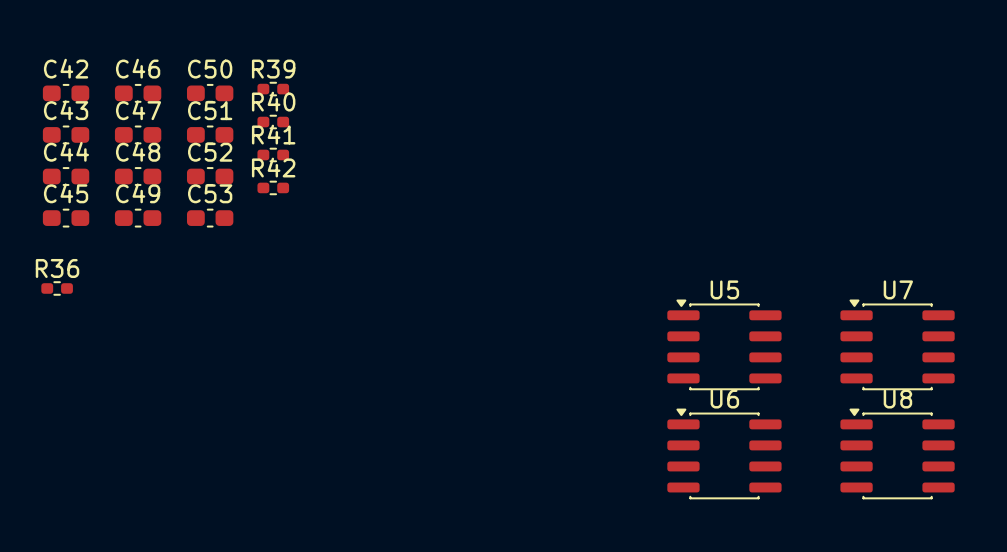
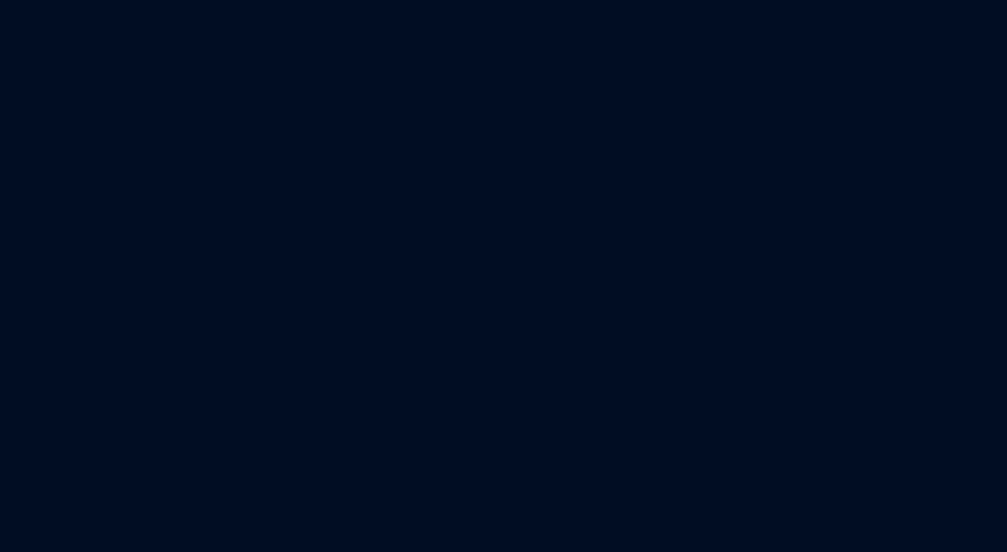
R39: (273, 89) -> none
C42: (66, 93) -> none
C46: (138, 93) -> none
C50: (210, 93) -> none
R40: (273, 122) -> none
C43: (66, 134) -> none
C47: (138, 134) -> none
C51: (210, 134) -> none
R41: (273, 154) -> none
C44: (66, 176) -> none
C48: (138, 176) -> none
C52: (210, 176) -> none
R42: (273, 187) -> none
C45: (66, 218) -> none
C49: (138, 218) -> none
C53: (210, 218) -> none
R36: (57, 288) -> none
U5: (724, 344) -> none
U7: (897, 344) -> none
U6: (724, 453) -> none
U8: (897, 453) -> none

